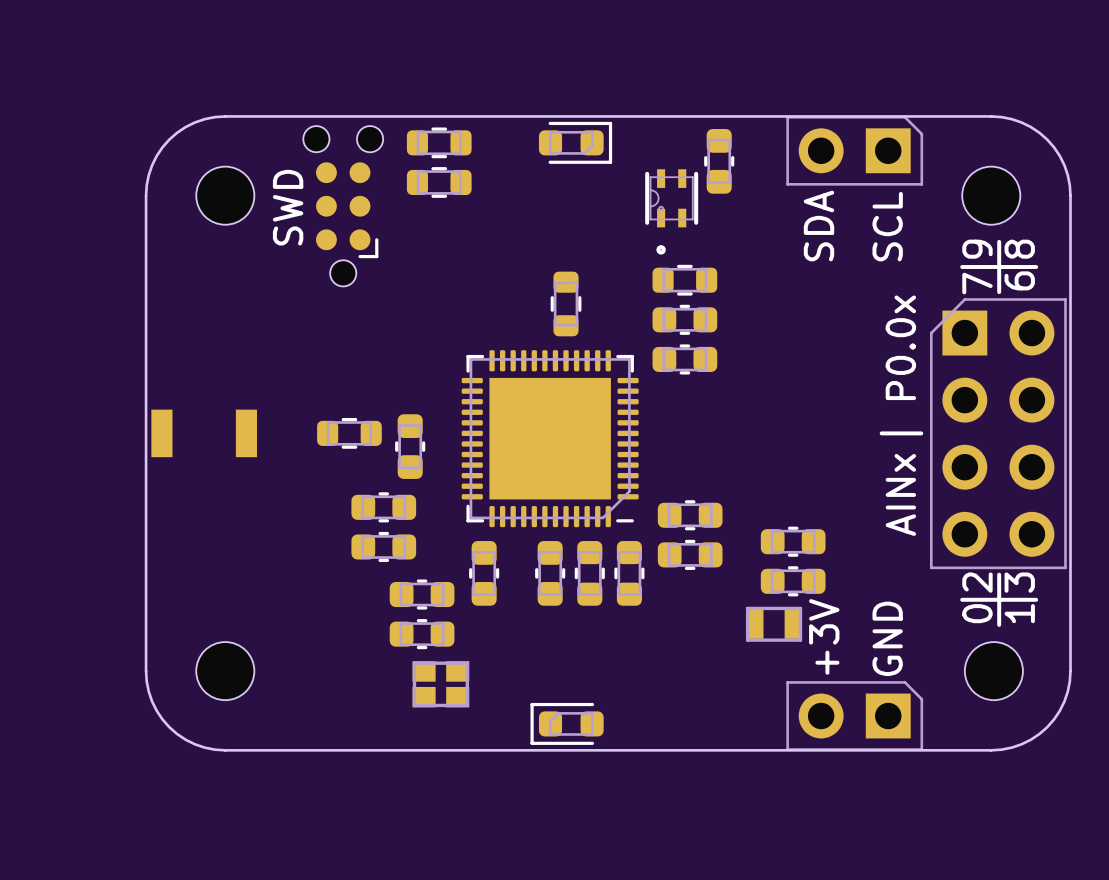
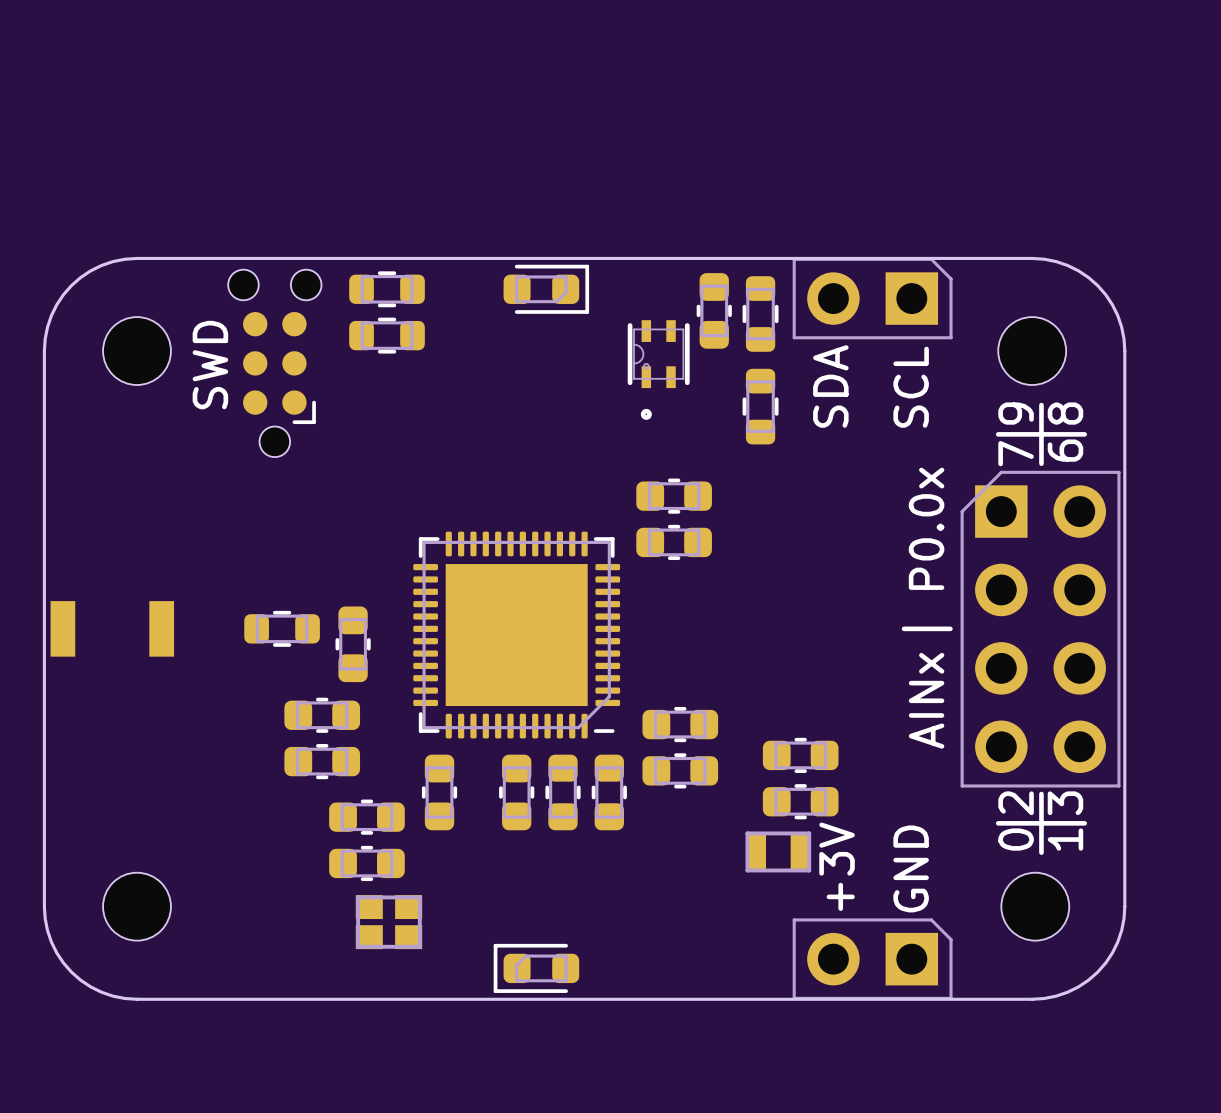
part: none -> (760, 313)
part: none -> (760, 406)
part: (684, 280) -> none
part: (566, 303) -> none

